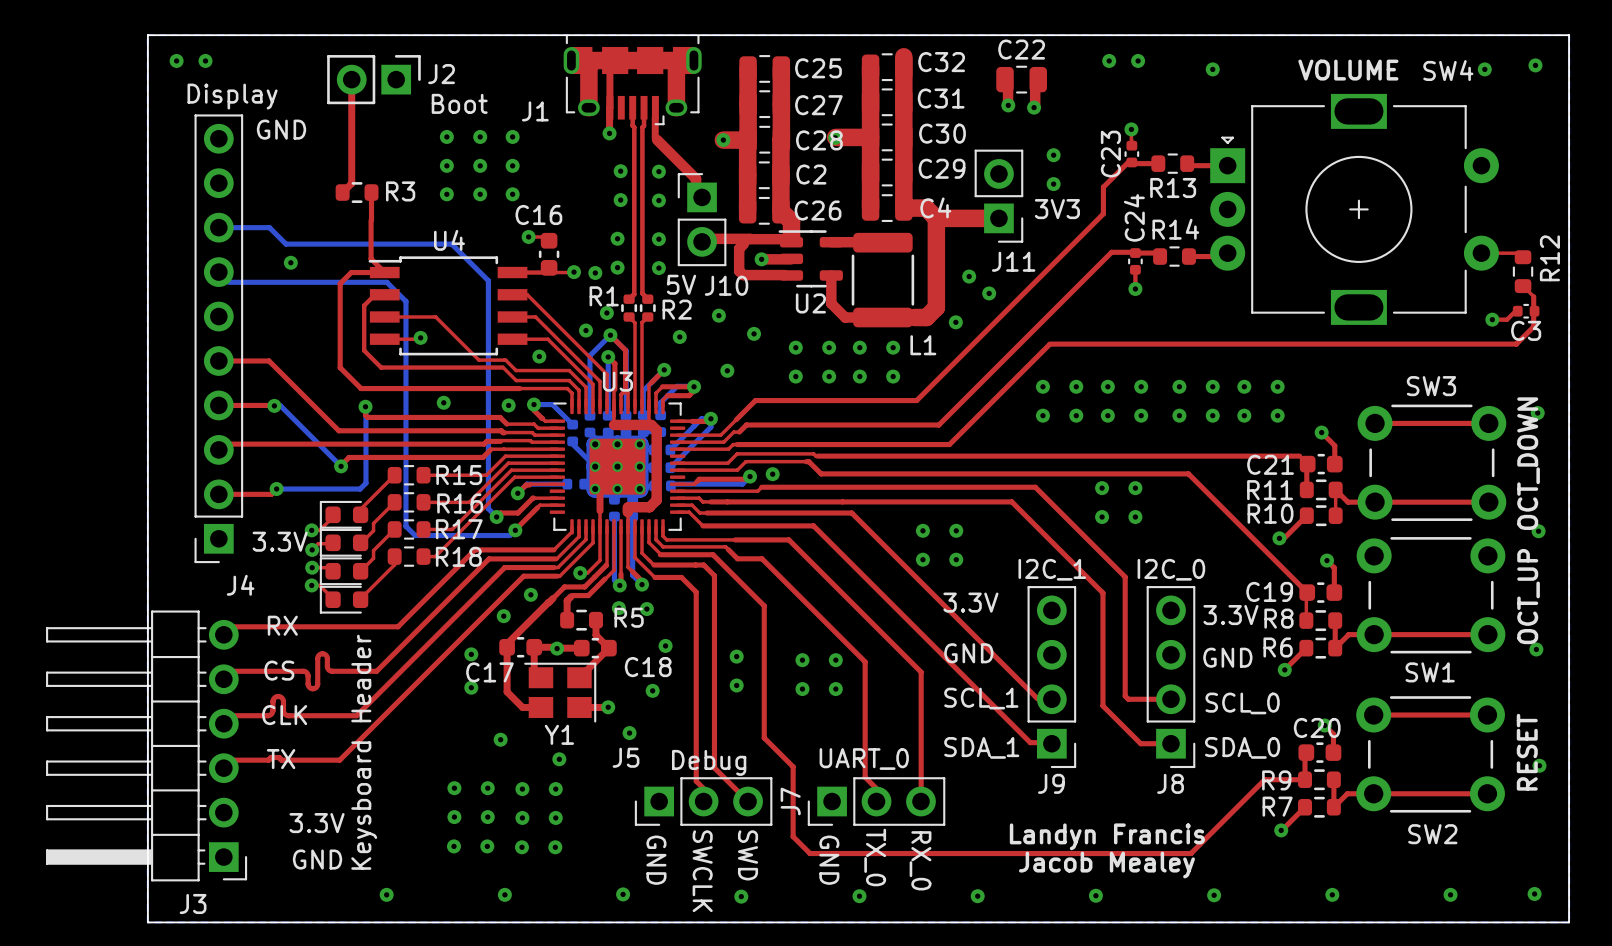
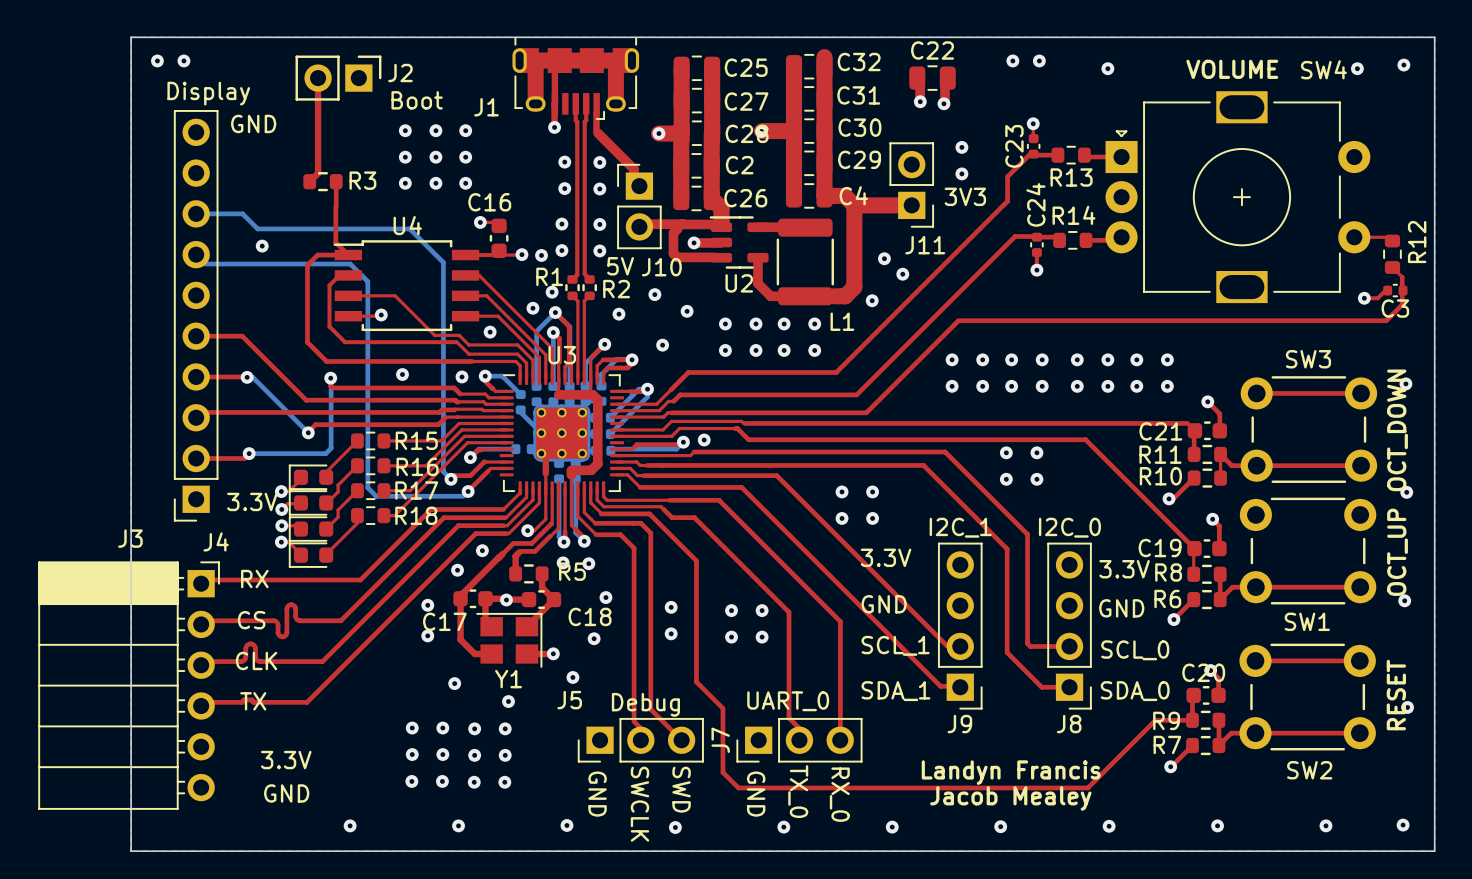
J3 footprint: [46, 610, 248, 882] -> [38, 561, 220, 810]
J3 value: Keysboard Header (364, 752) -> none
J3 name position: J3 (193, 903) -> J3 (130, 538)

